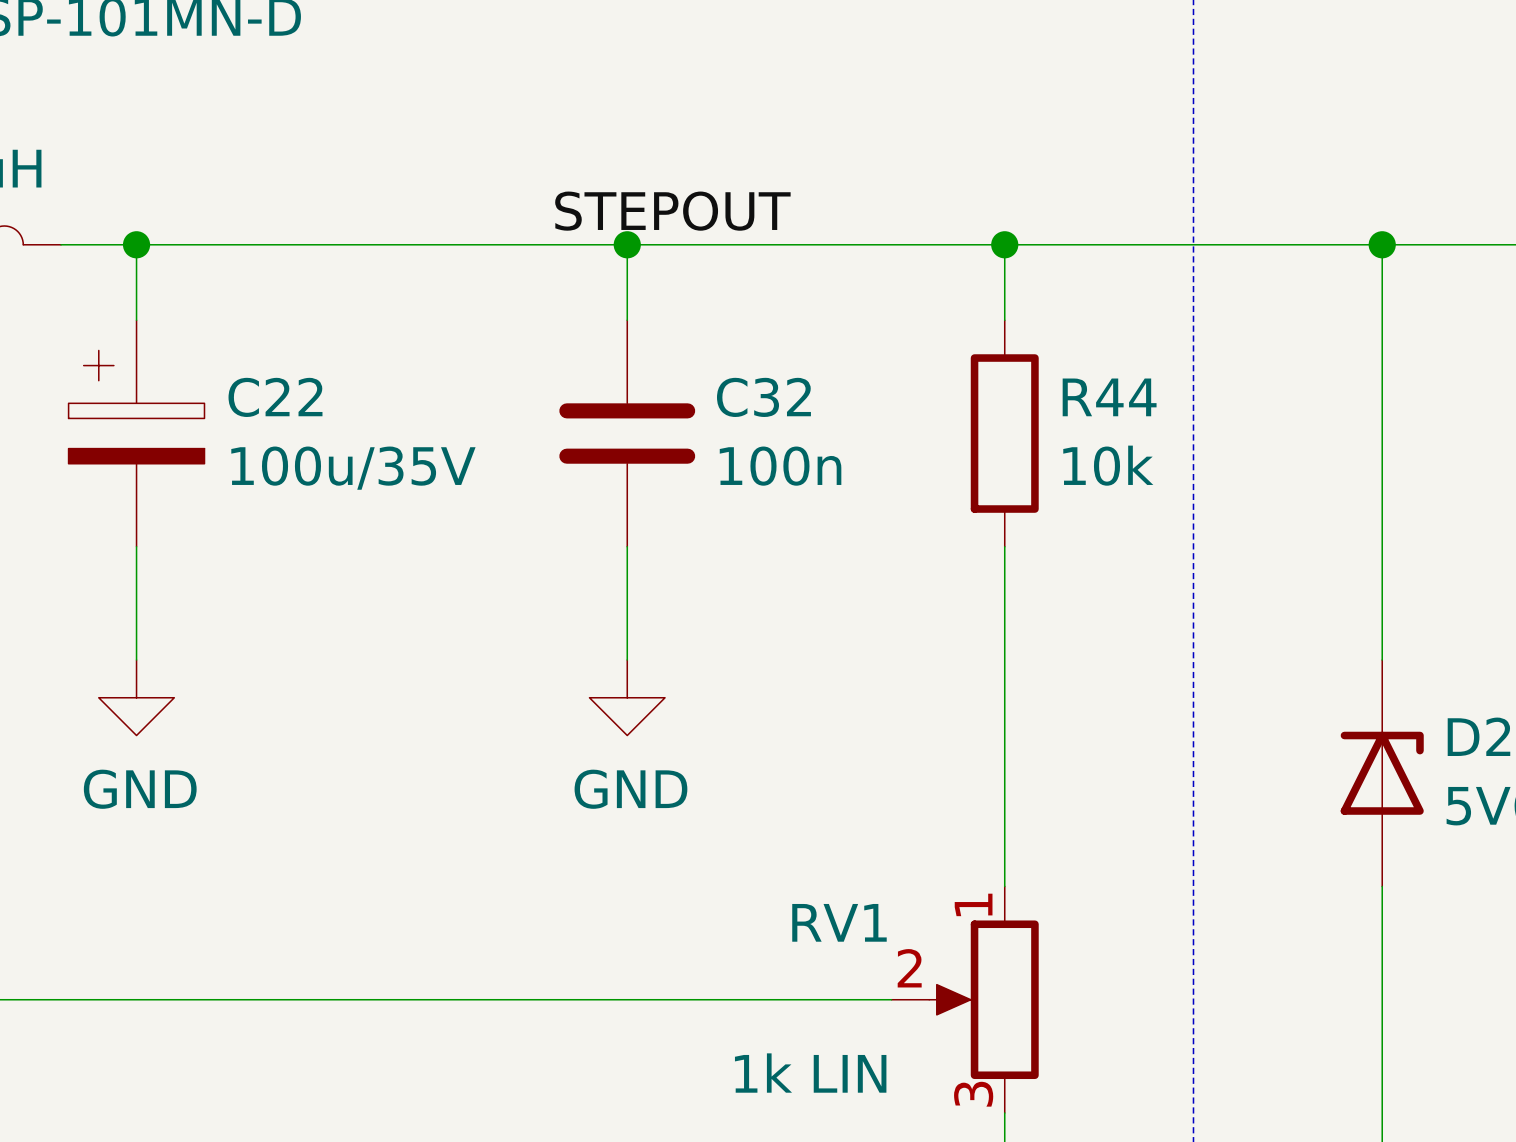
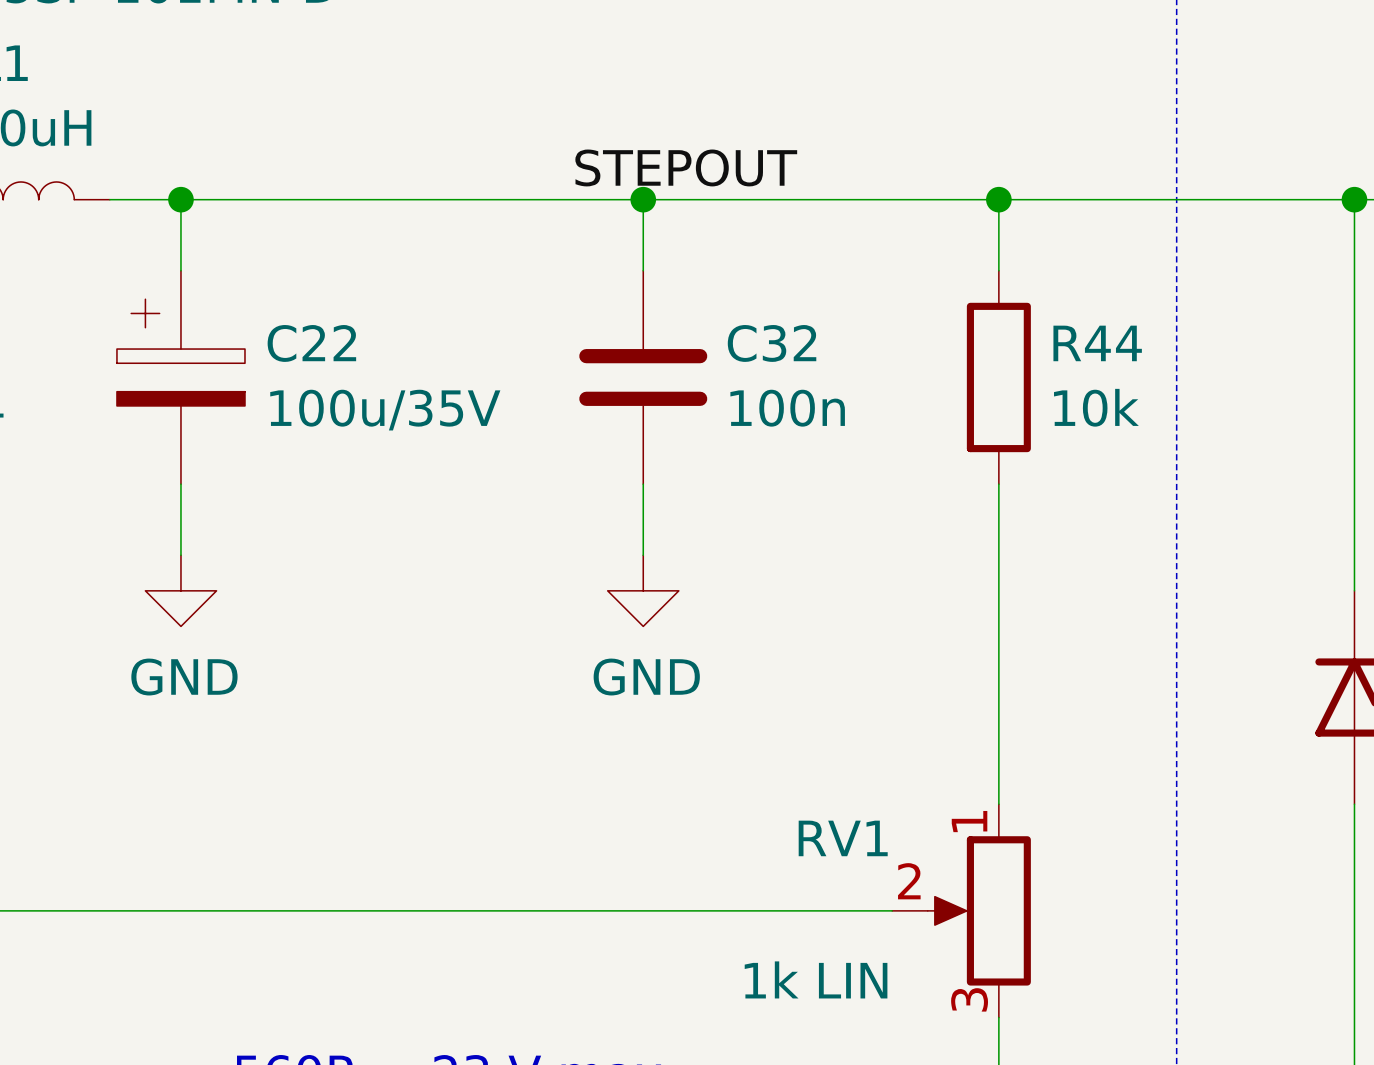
power symbol position: GND (136, 697) -> GND (180, 590)
power symbol position: GND (627, 697) -> GND (643, 590)

